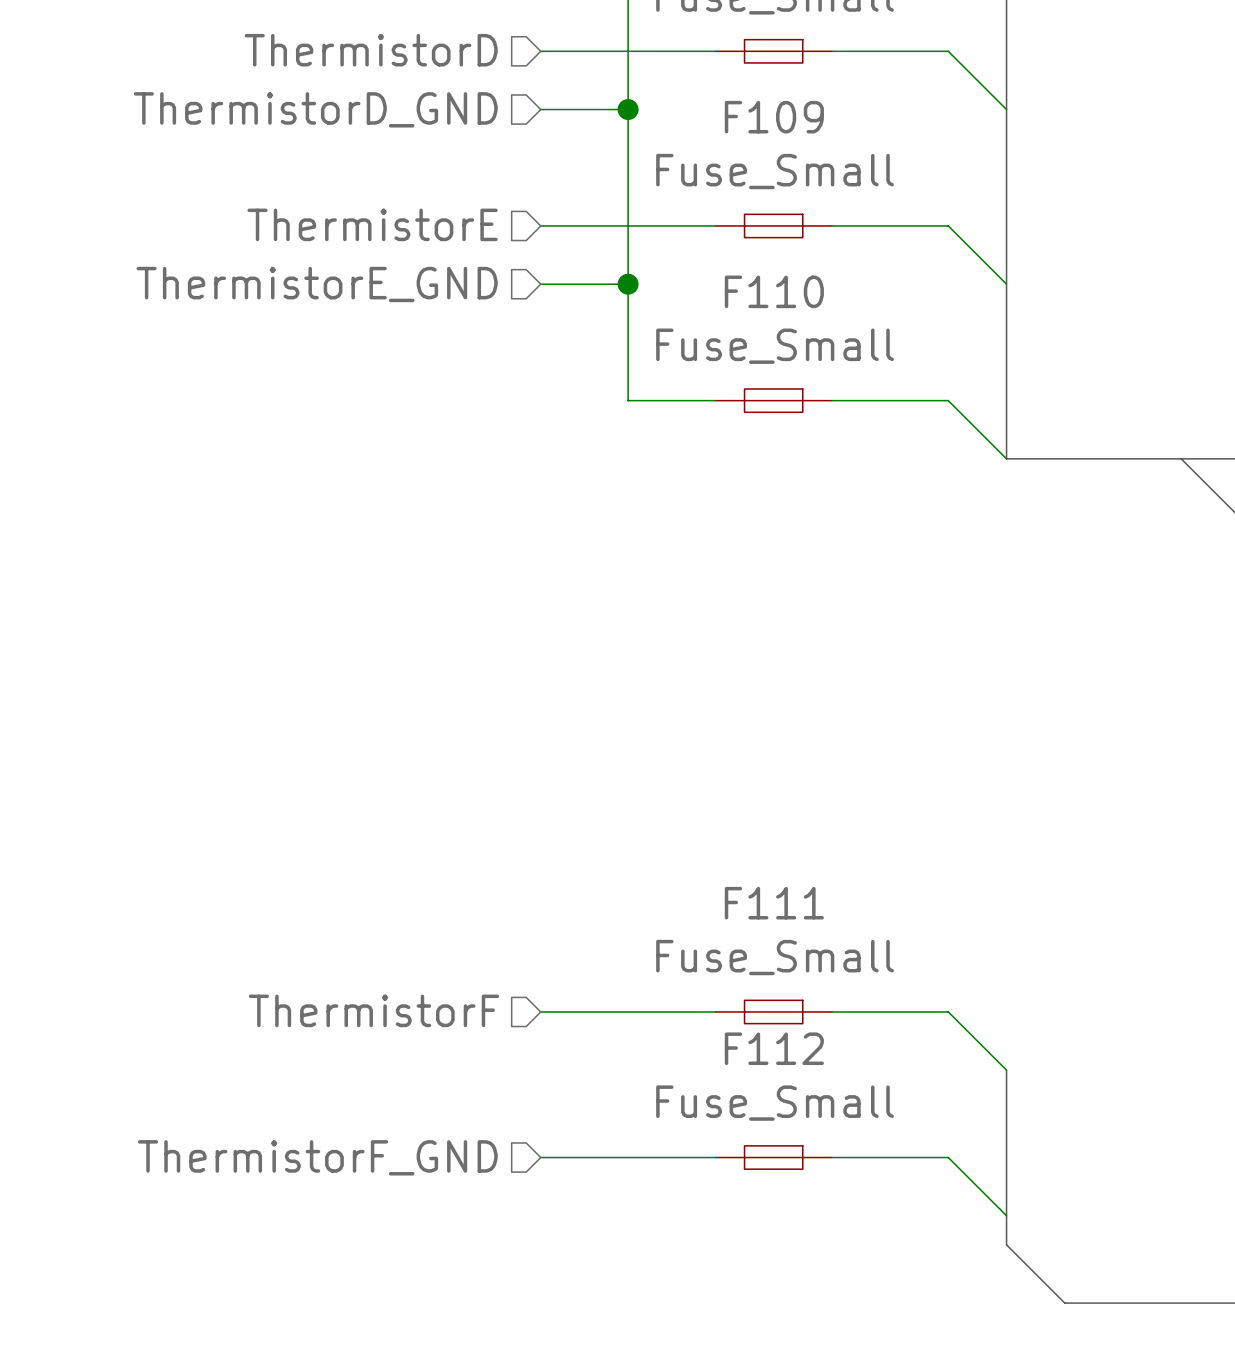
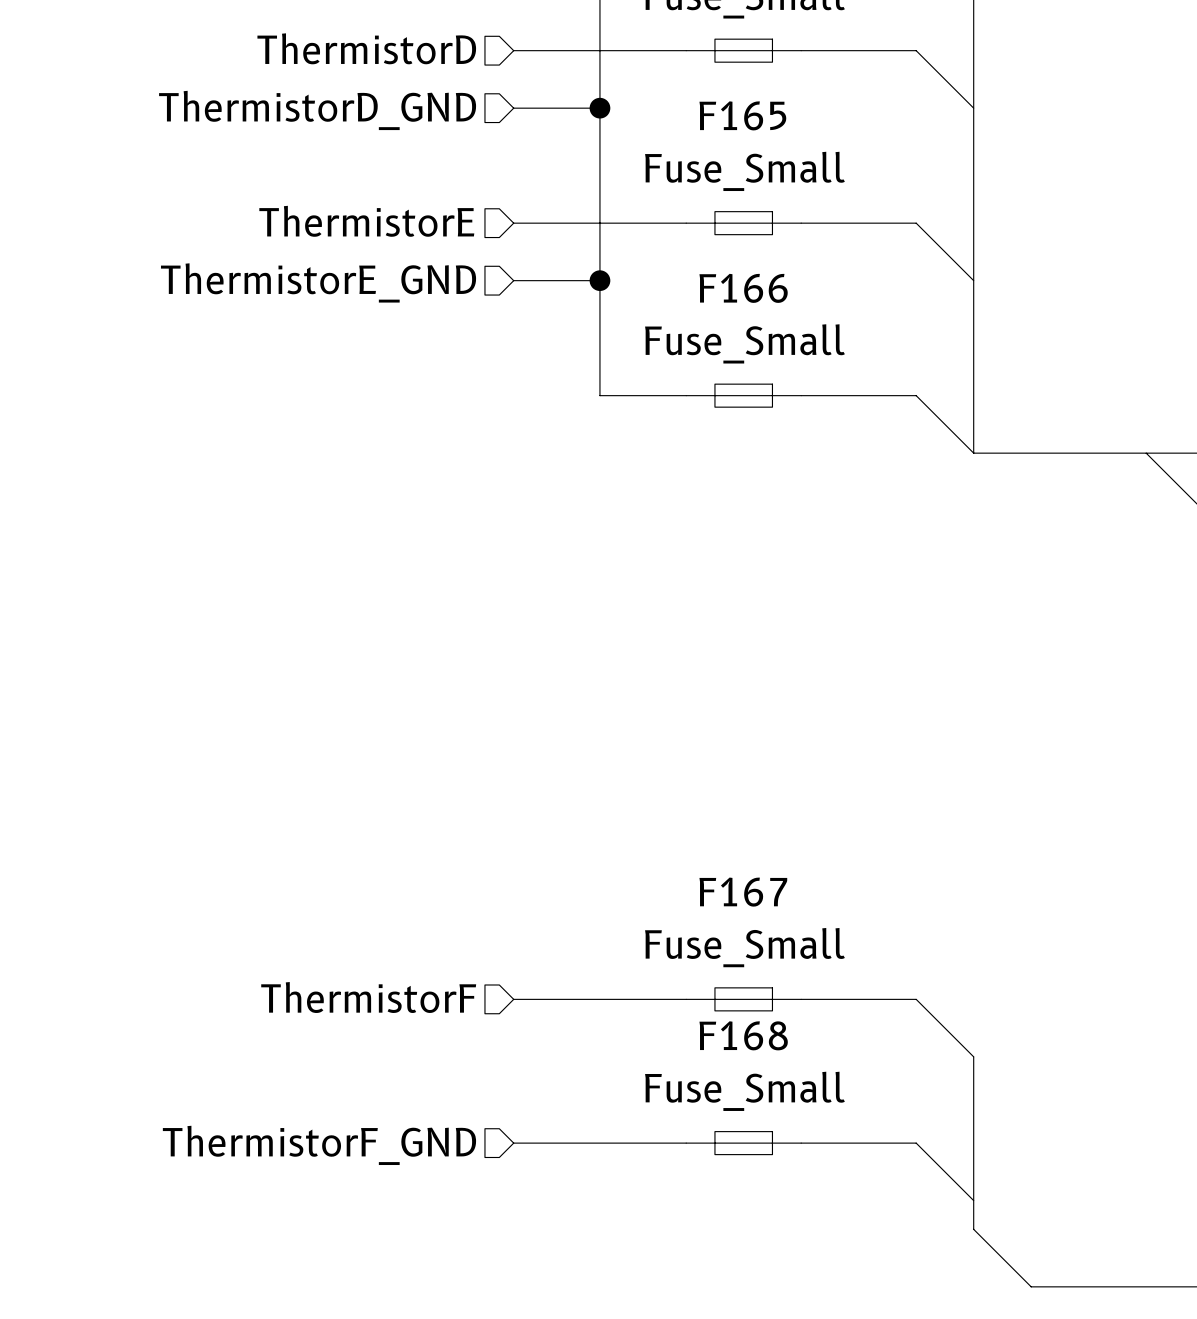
F109 name: F109 (774, 117) -> F165 (742, 115)
F110 name: F110 (774, 291) -> F166 (743, 288)
F111 name: F111 (774, 903) -> F167 (743, 892)
F112 name: F112 (774, 1048) -> F168 (743, 1035)

